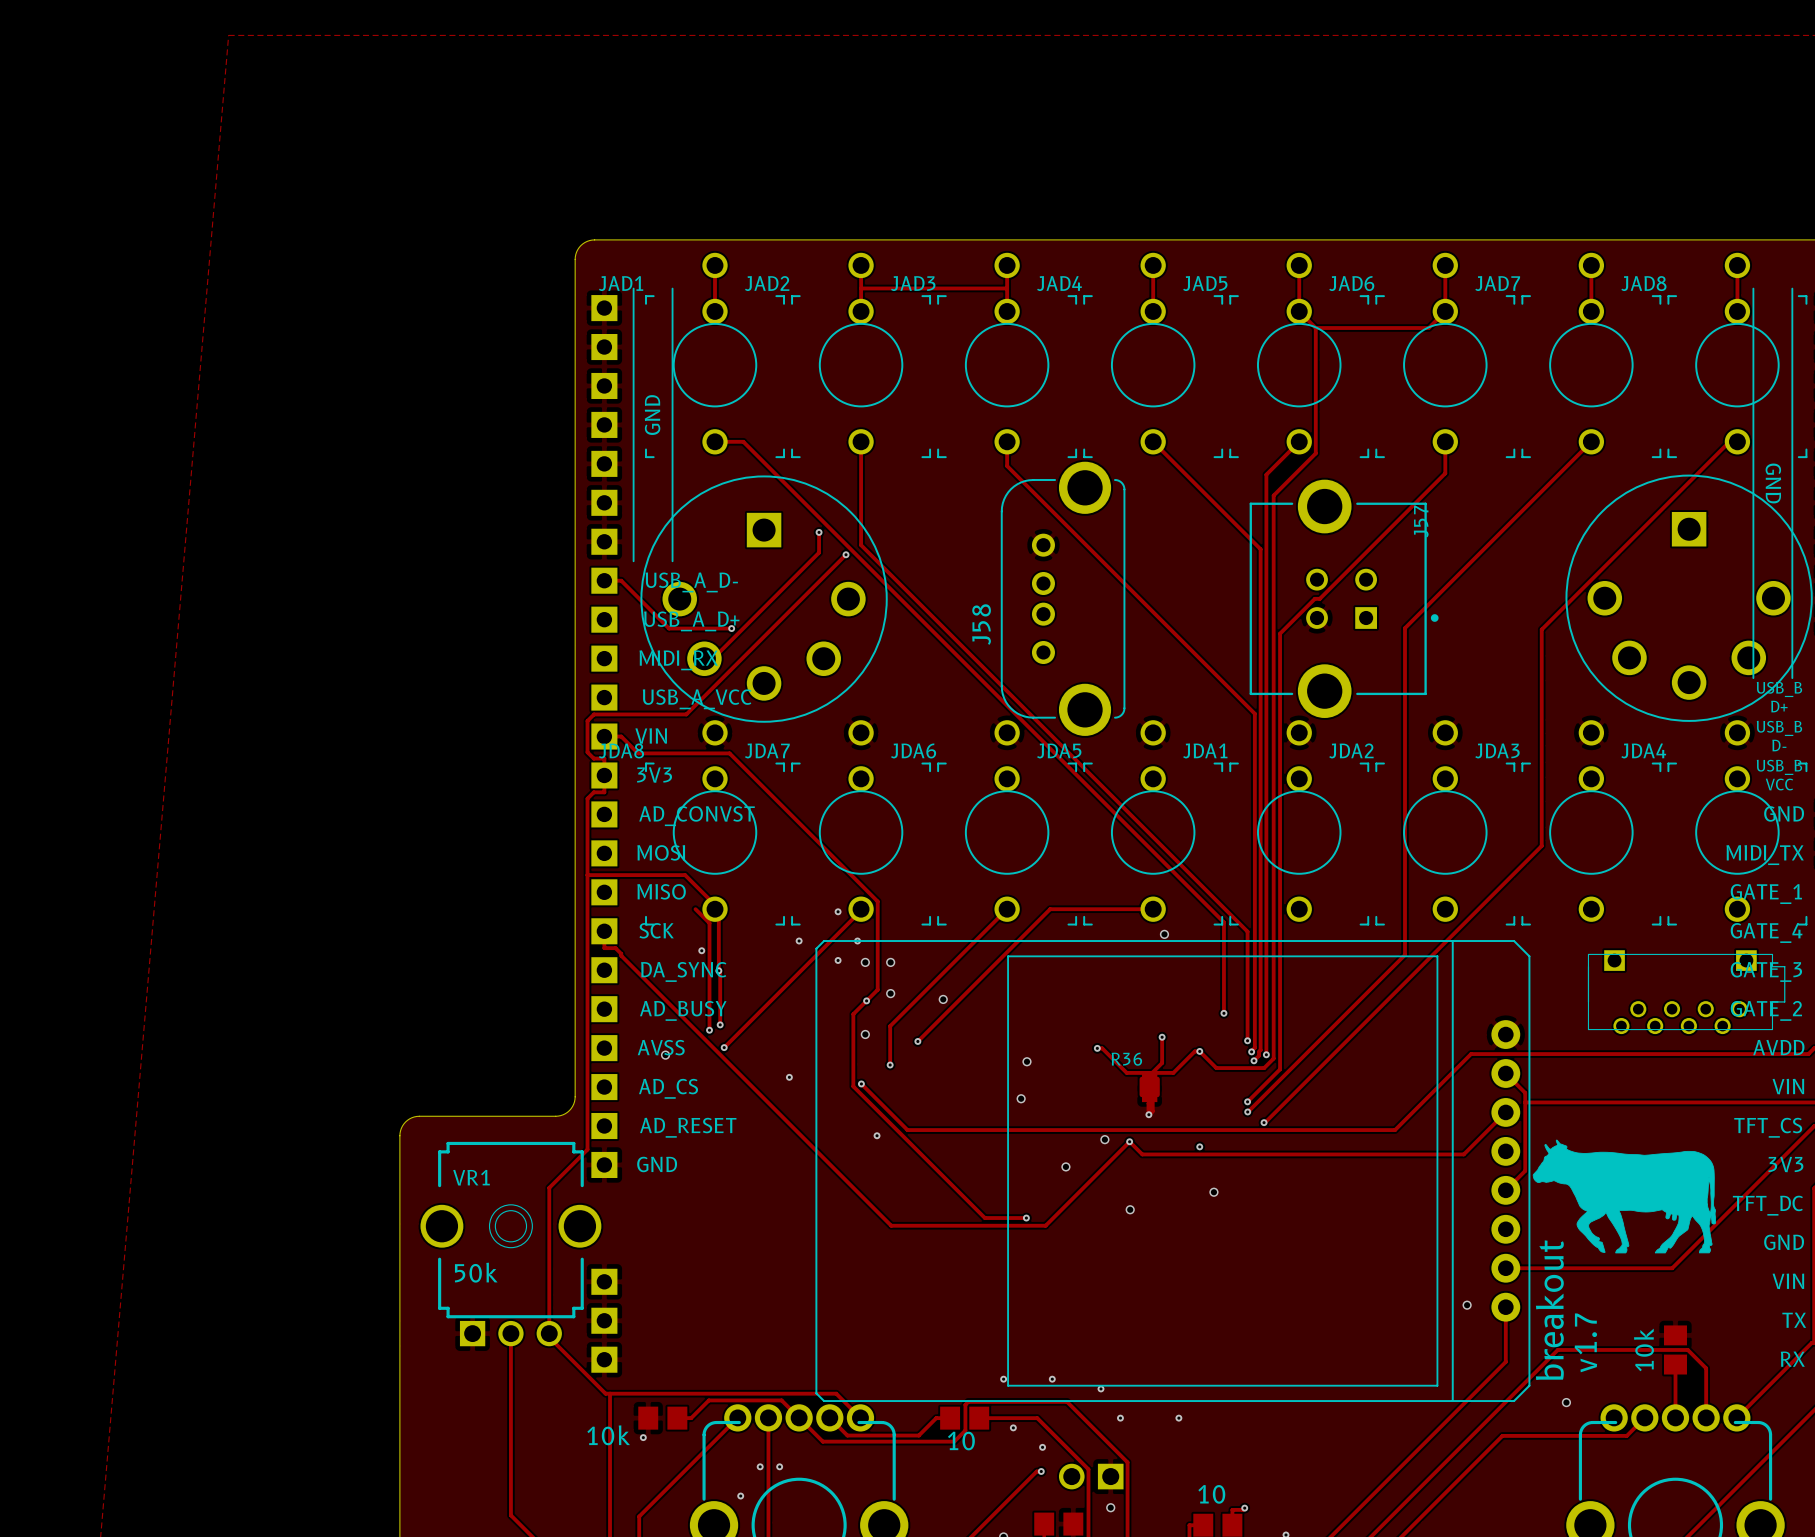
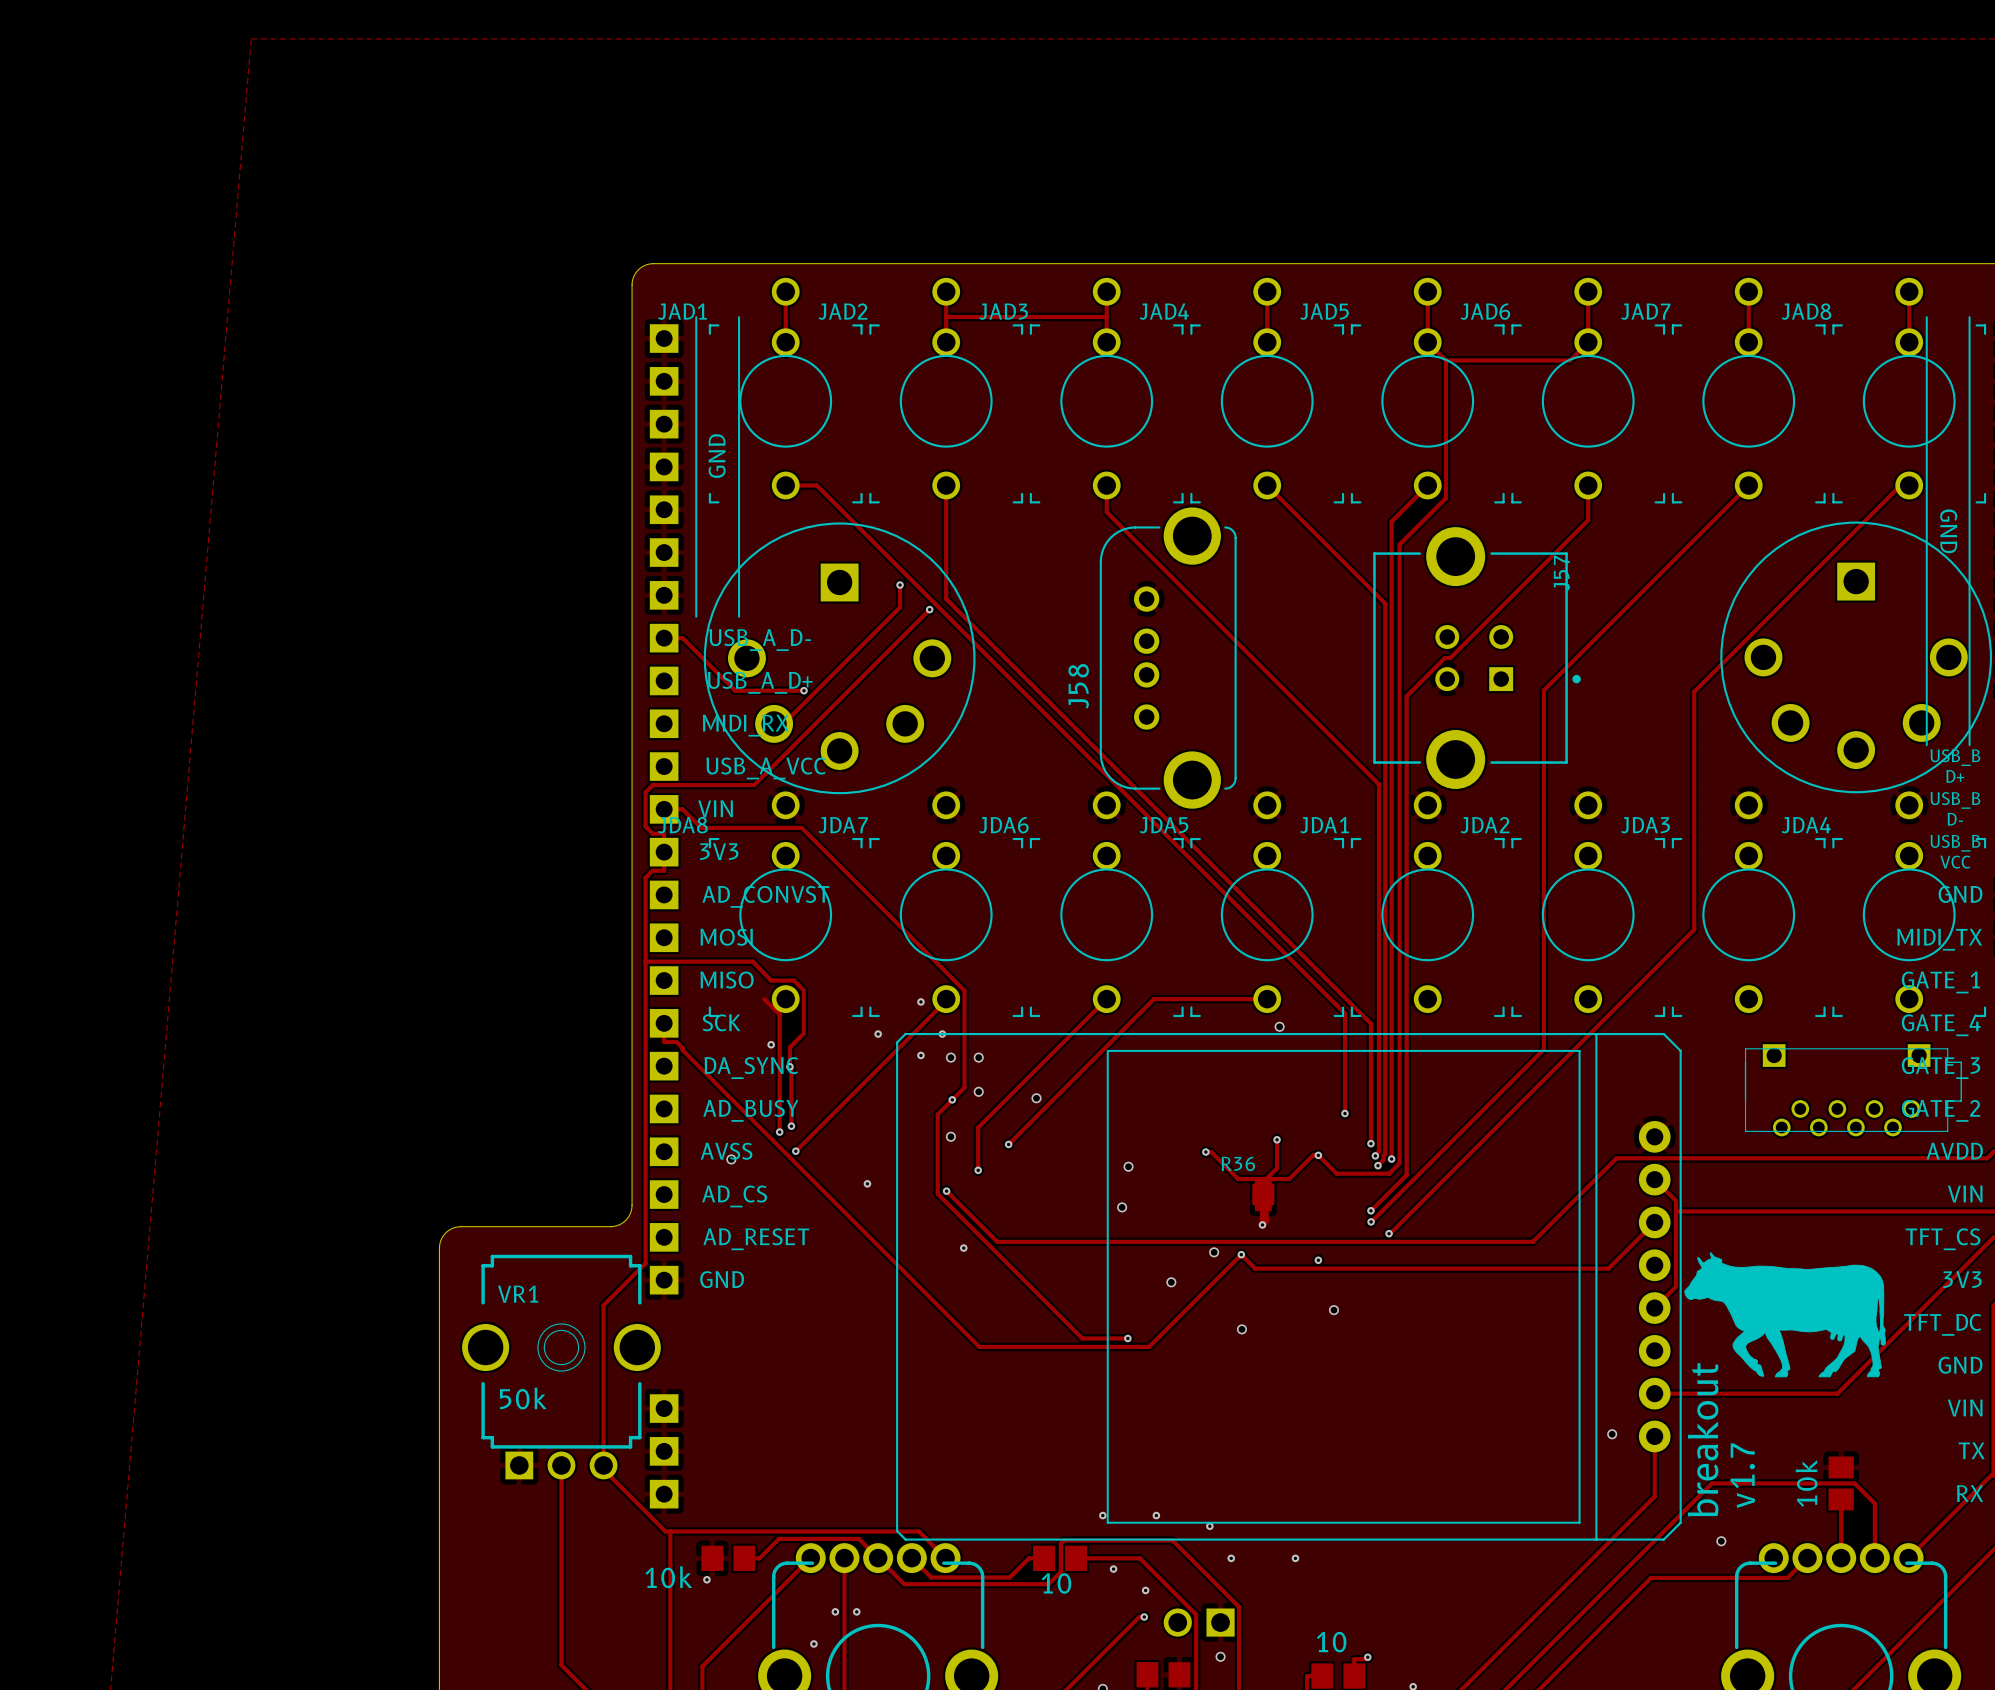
track: (685, 875) (718, 908) (718, 953) -> (752, 961) (771, 980) (793, 980) (803, 990) (803, 1033) (789, 1047)

